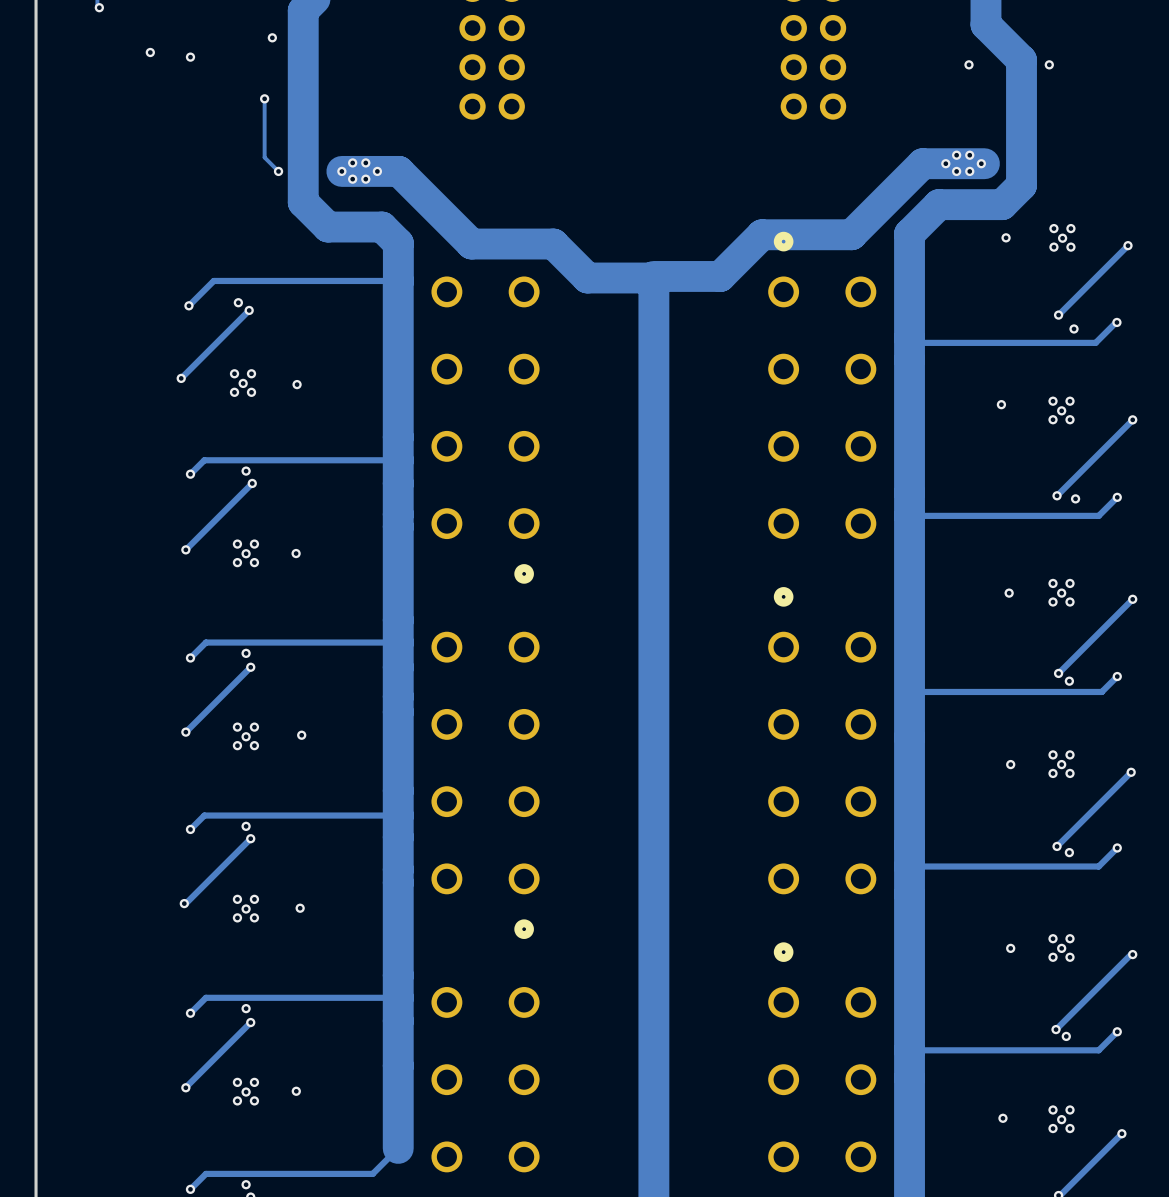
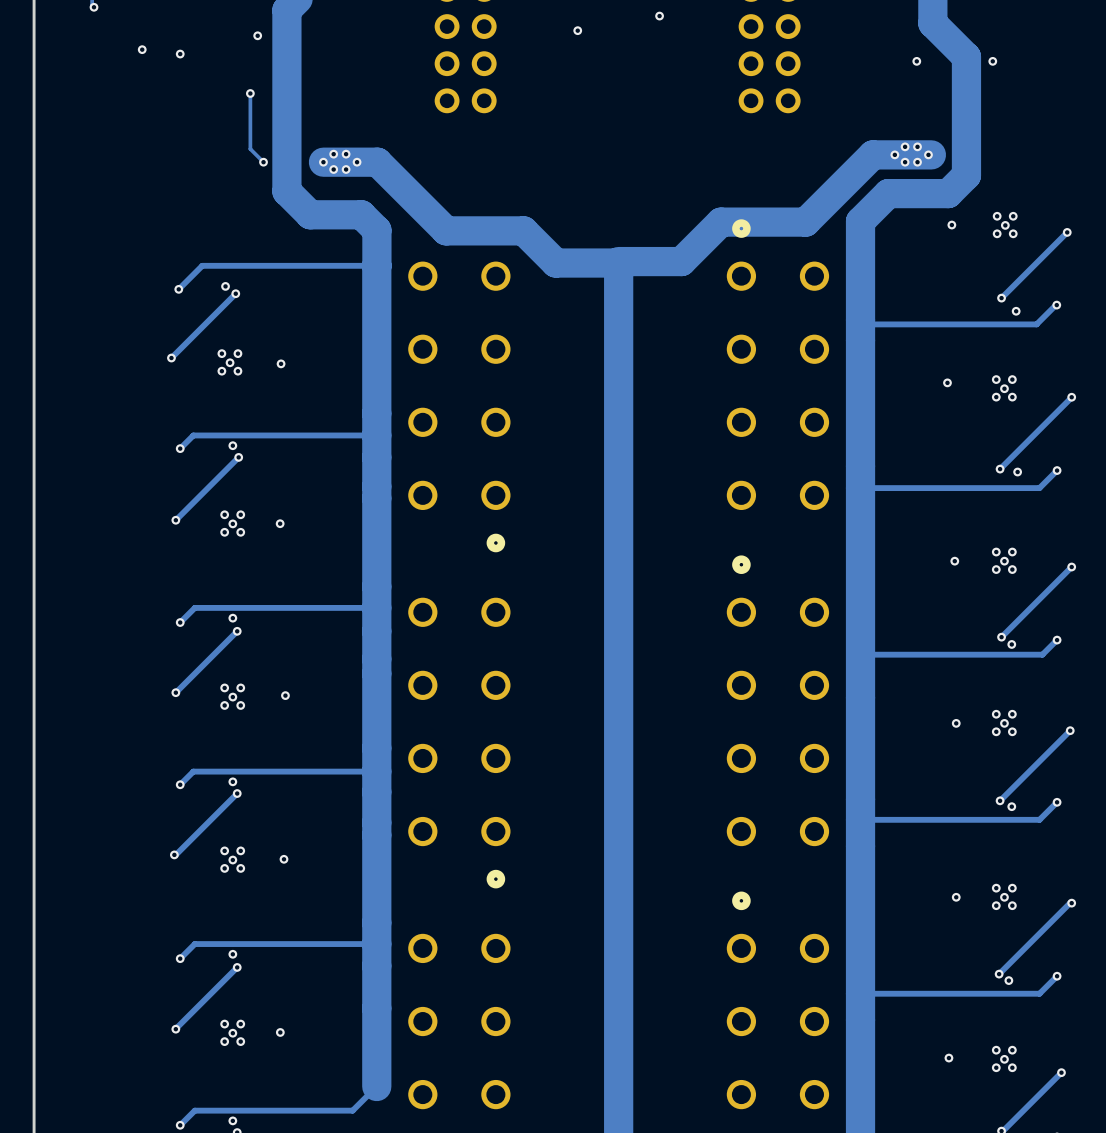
via: none -> (659, 16)
via: none -> (577, 30)

